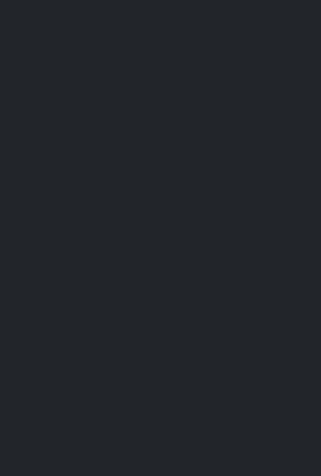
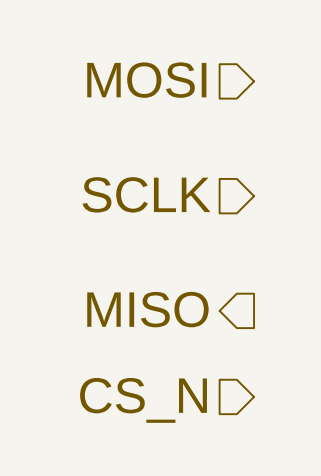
hierarchical label: none -> MOSI (146, 80)
hierarchical label: none -> SCLK (146, 194)
hierarchical label: none -> MISO (147, 309)
hierarchical label: none -> CS_N (143, 400)

